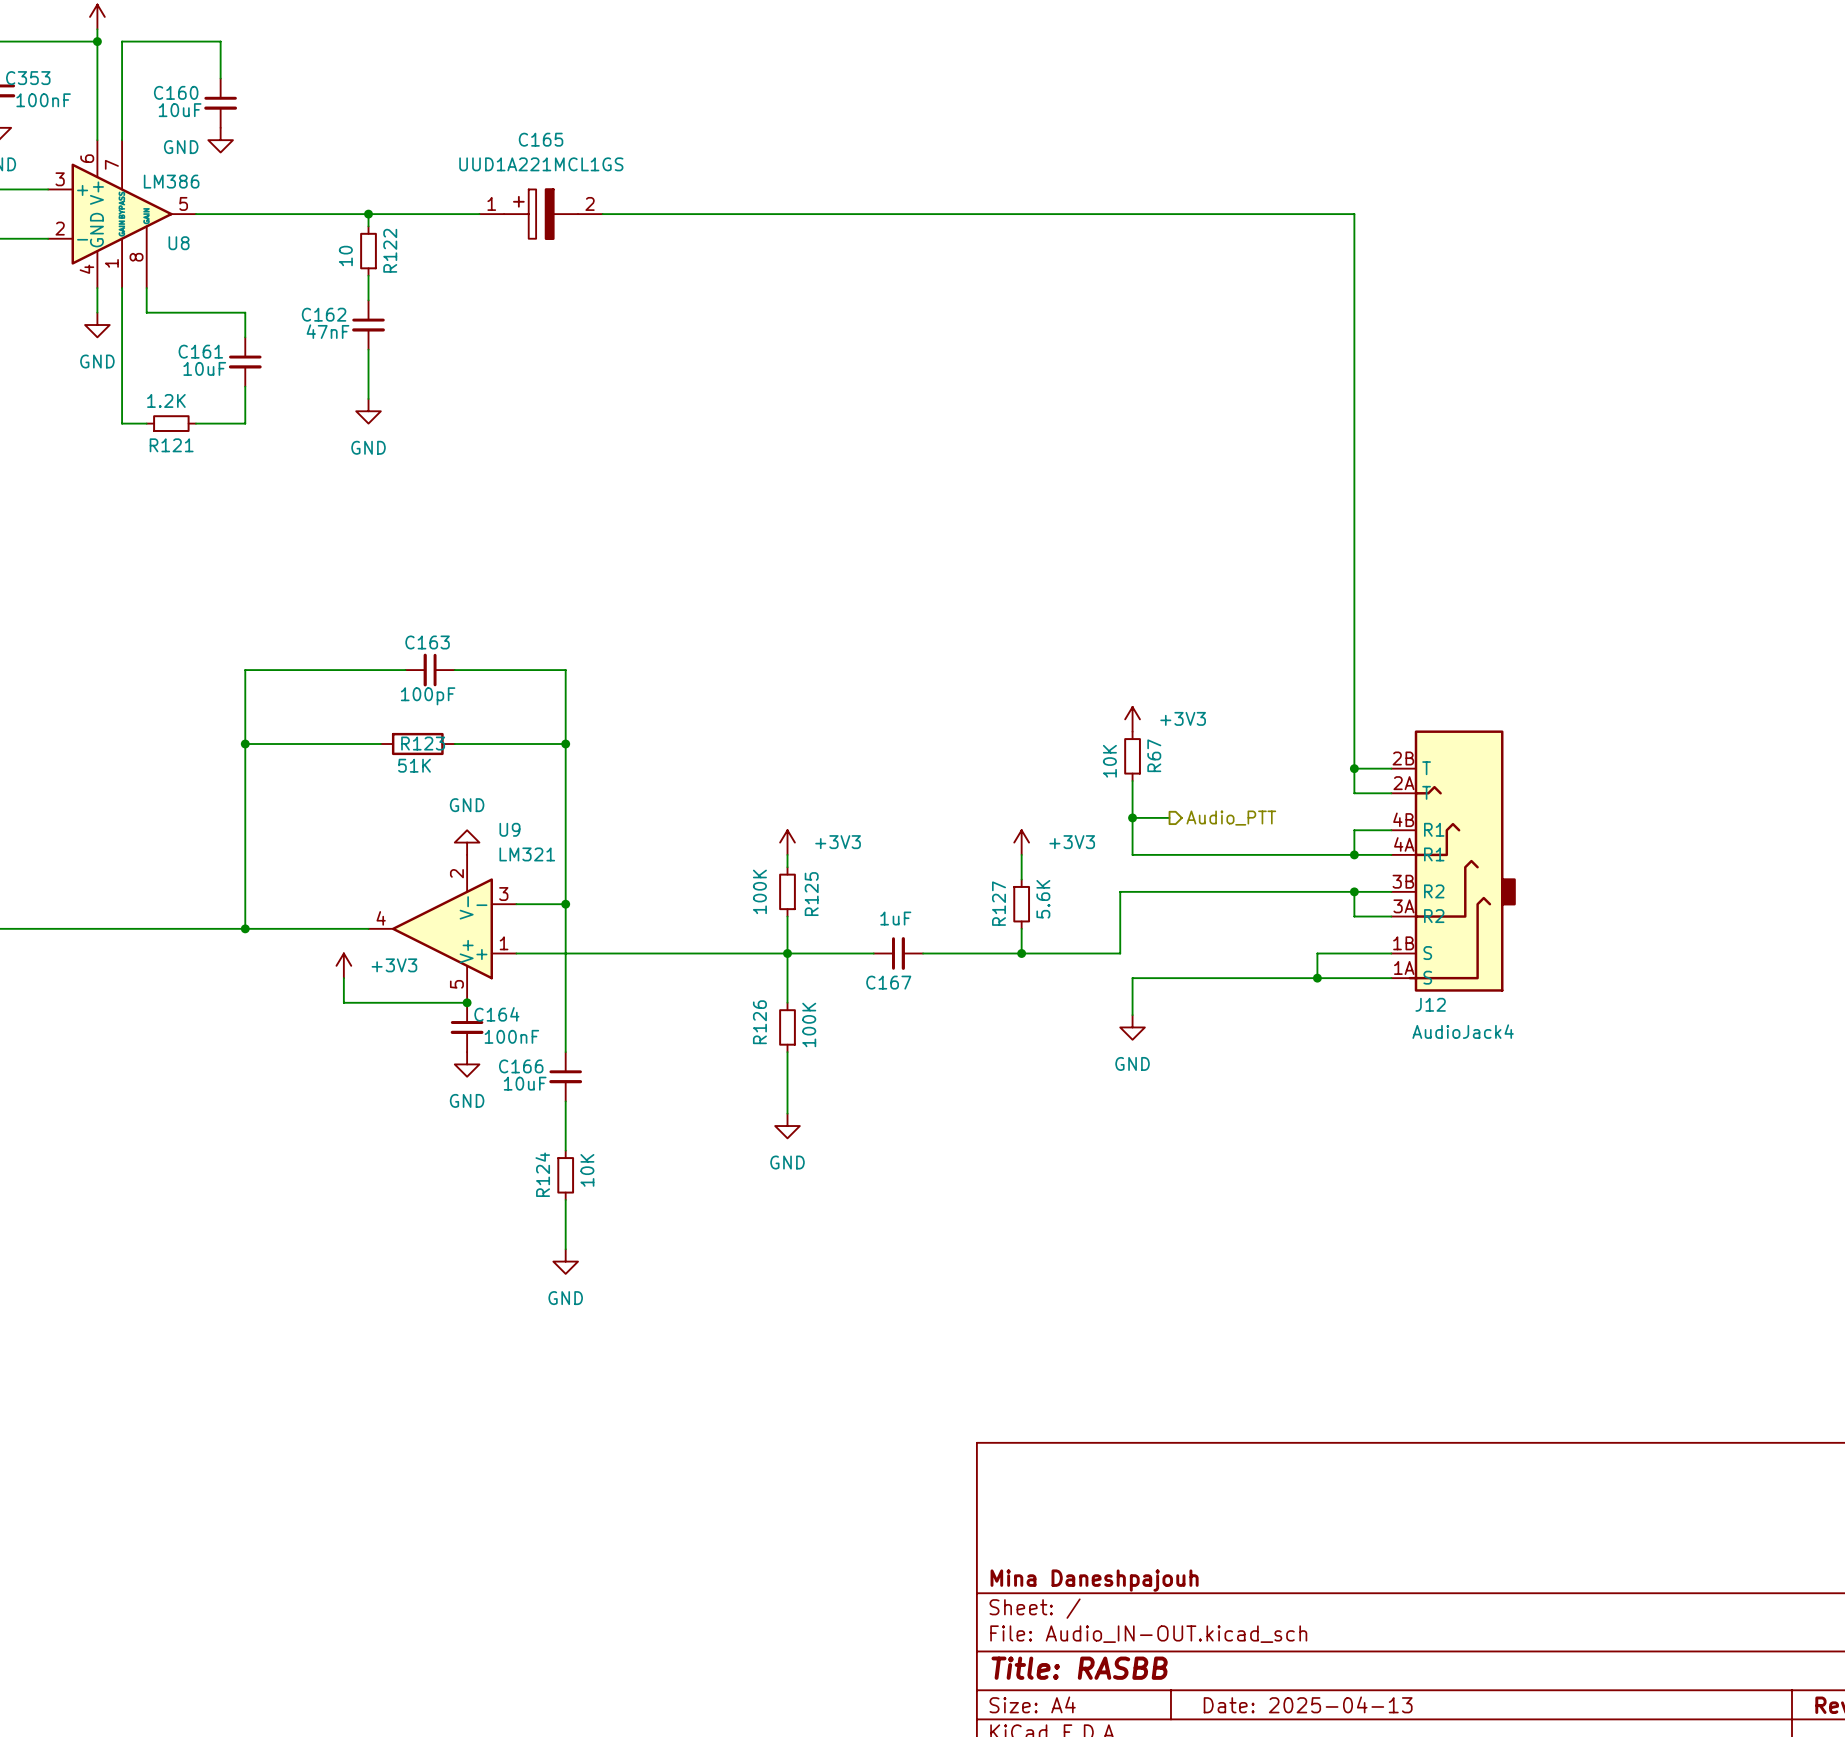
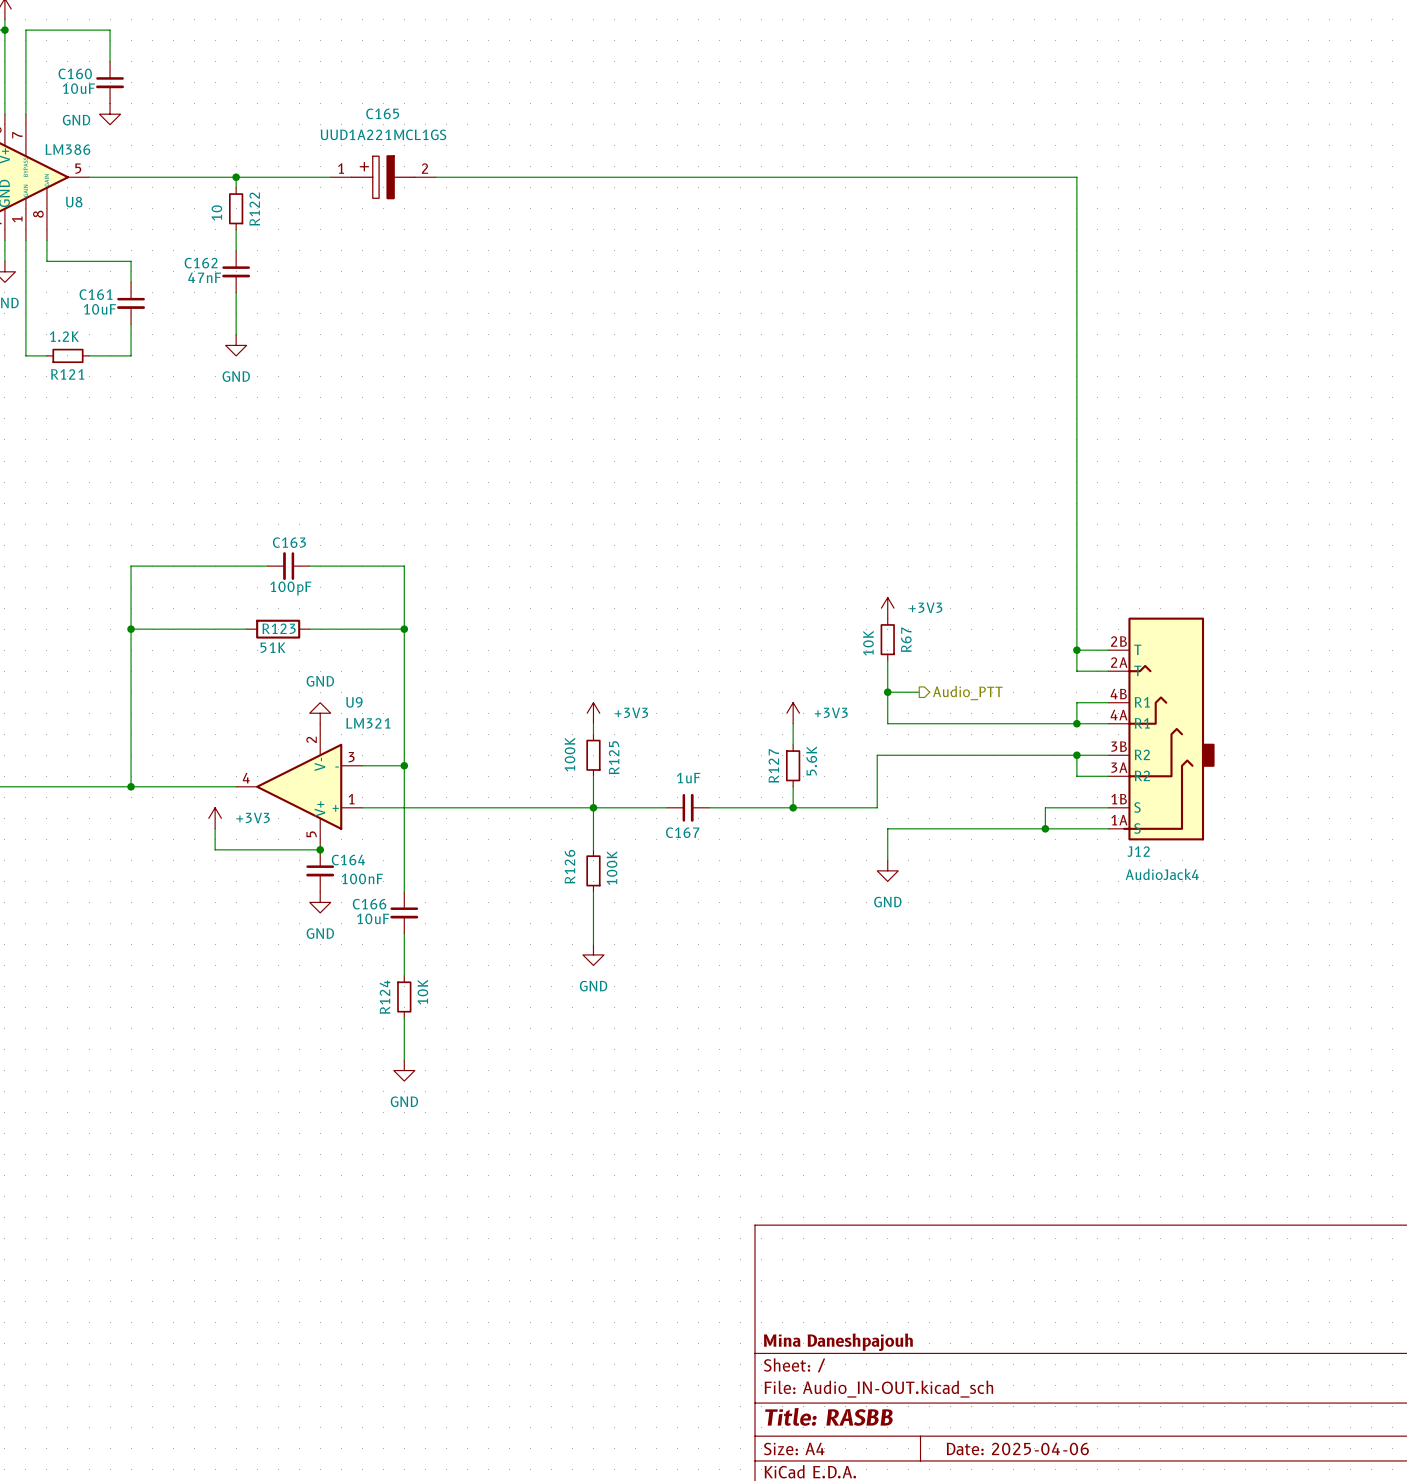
title block: Date: 2025-04-13 (1308, 1704) -> Date: 2025-04-06 (1017, 1449)

